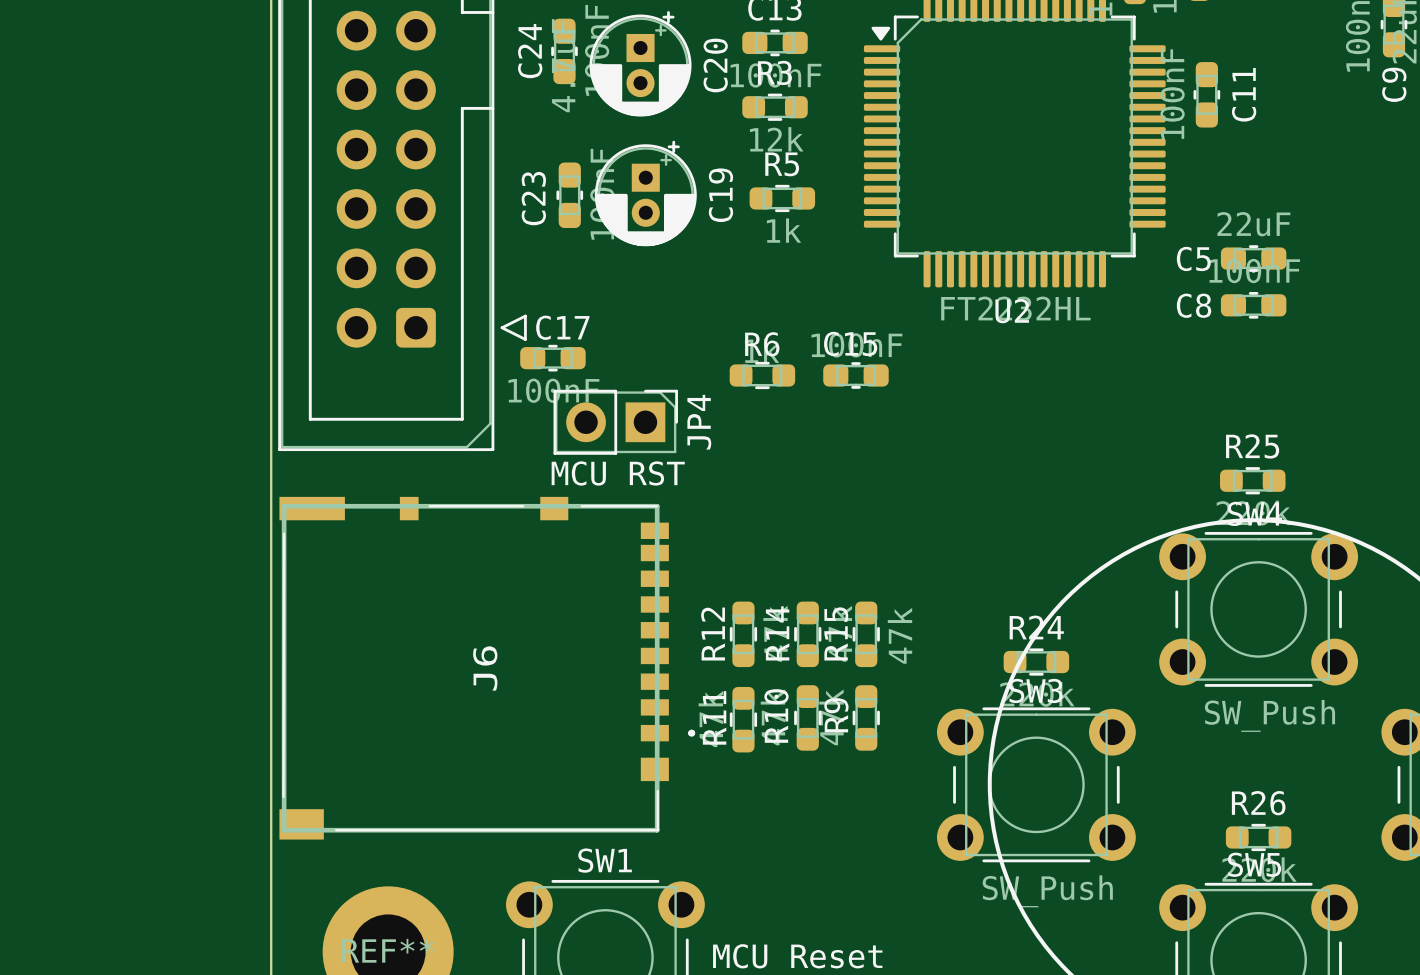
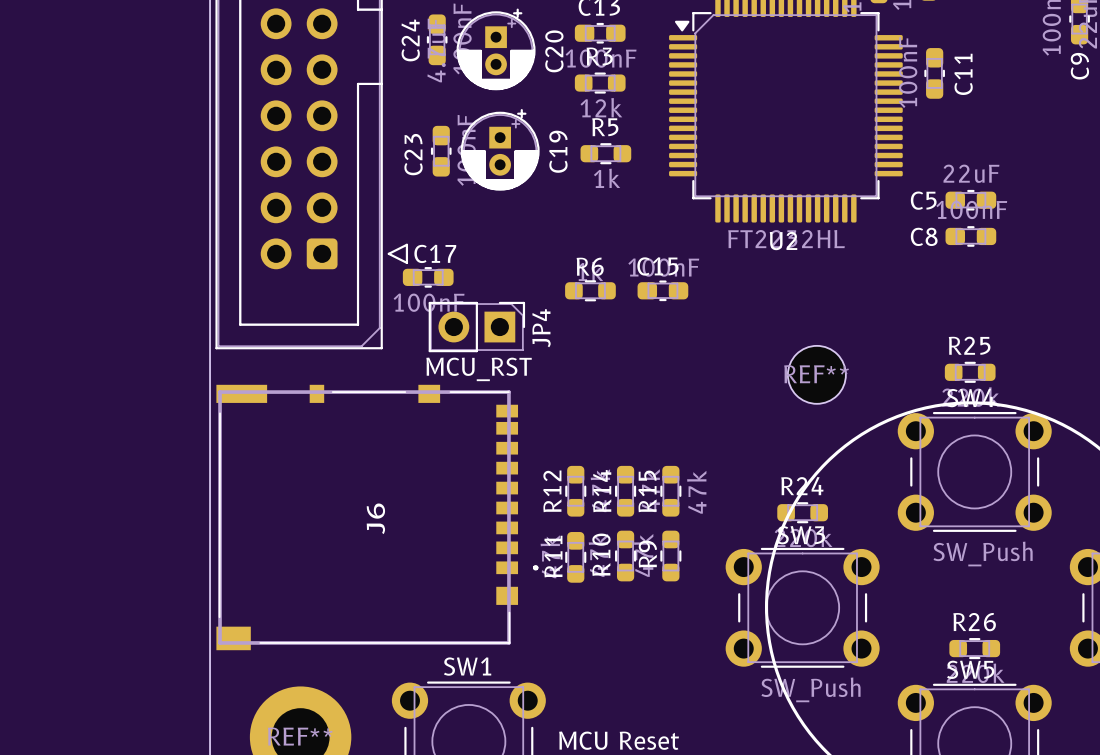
JP4 value: MCU RST (618, 473) -> MCU_RST (479, 369)
REF**: none -> (816, 374)

